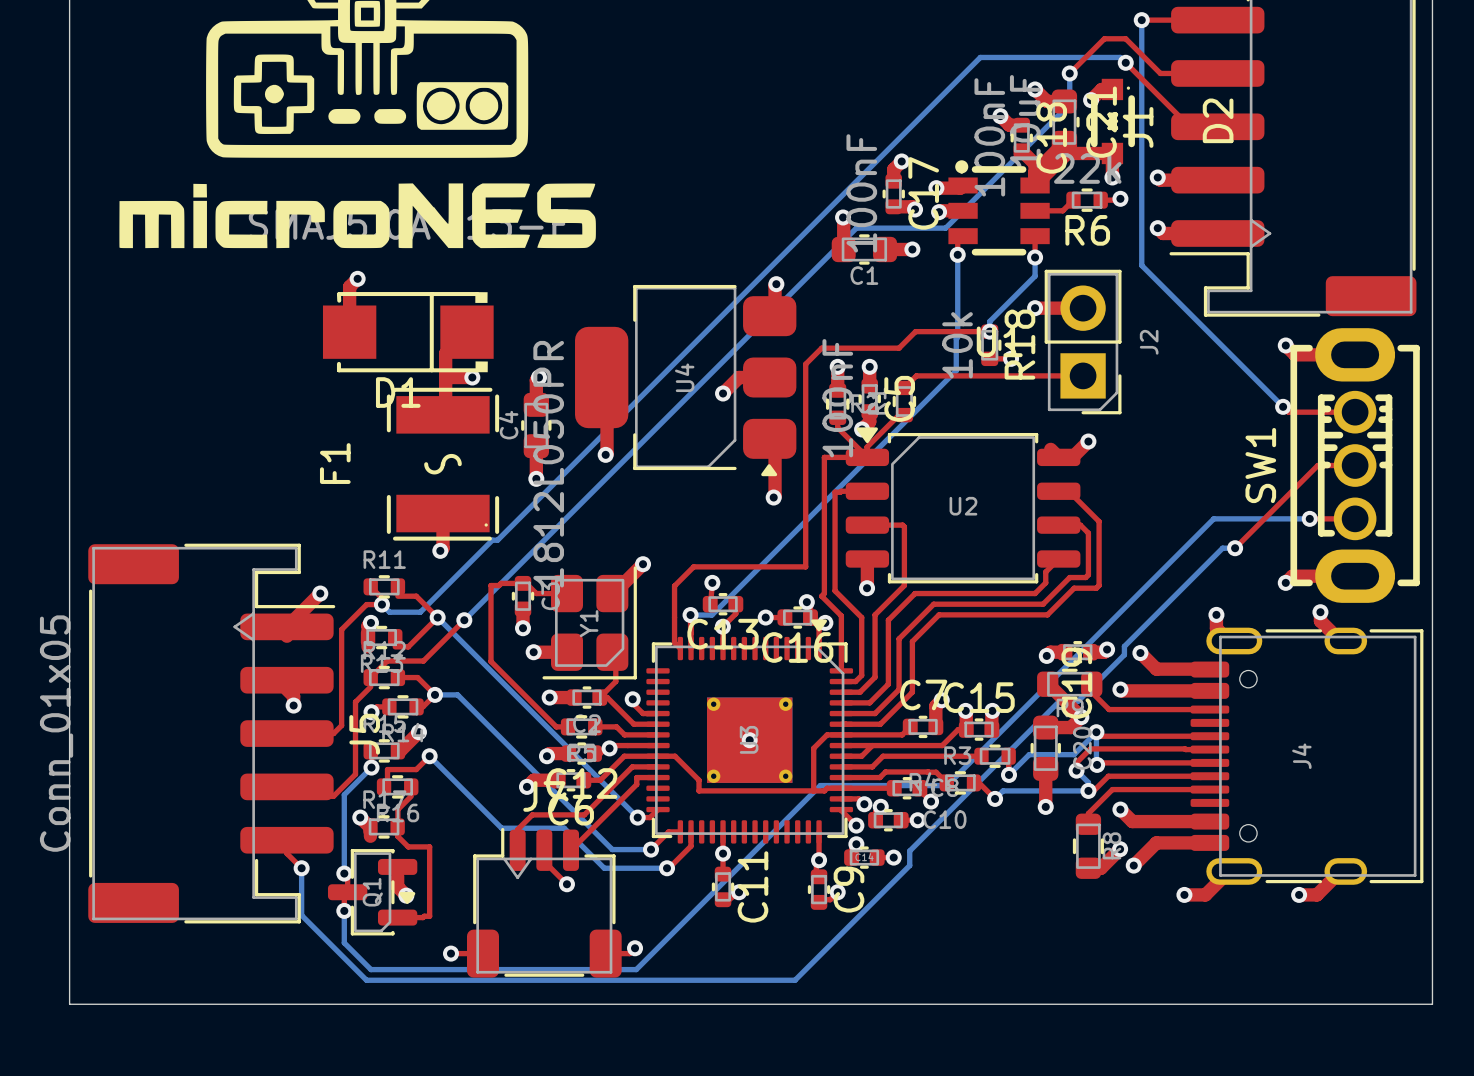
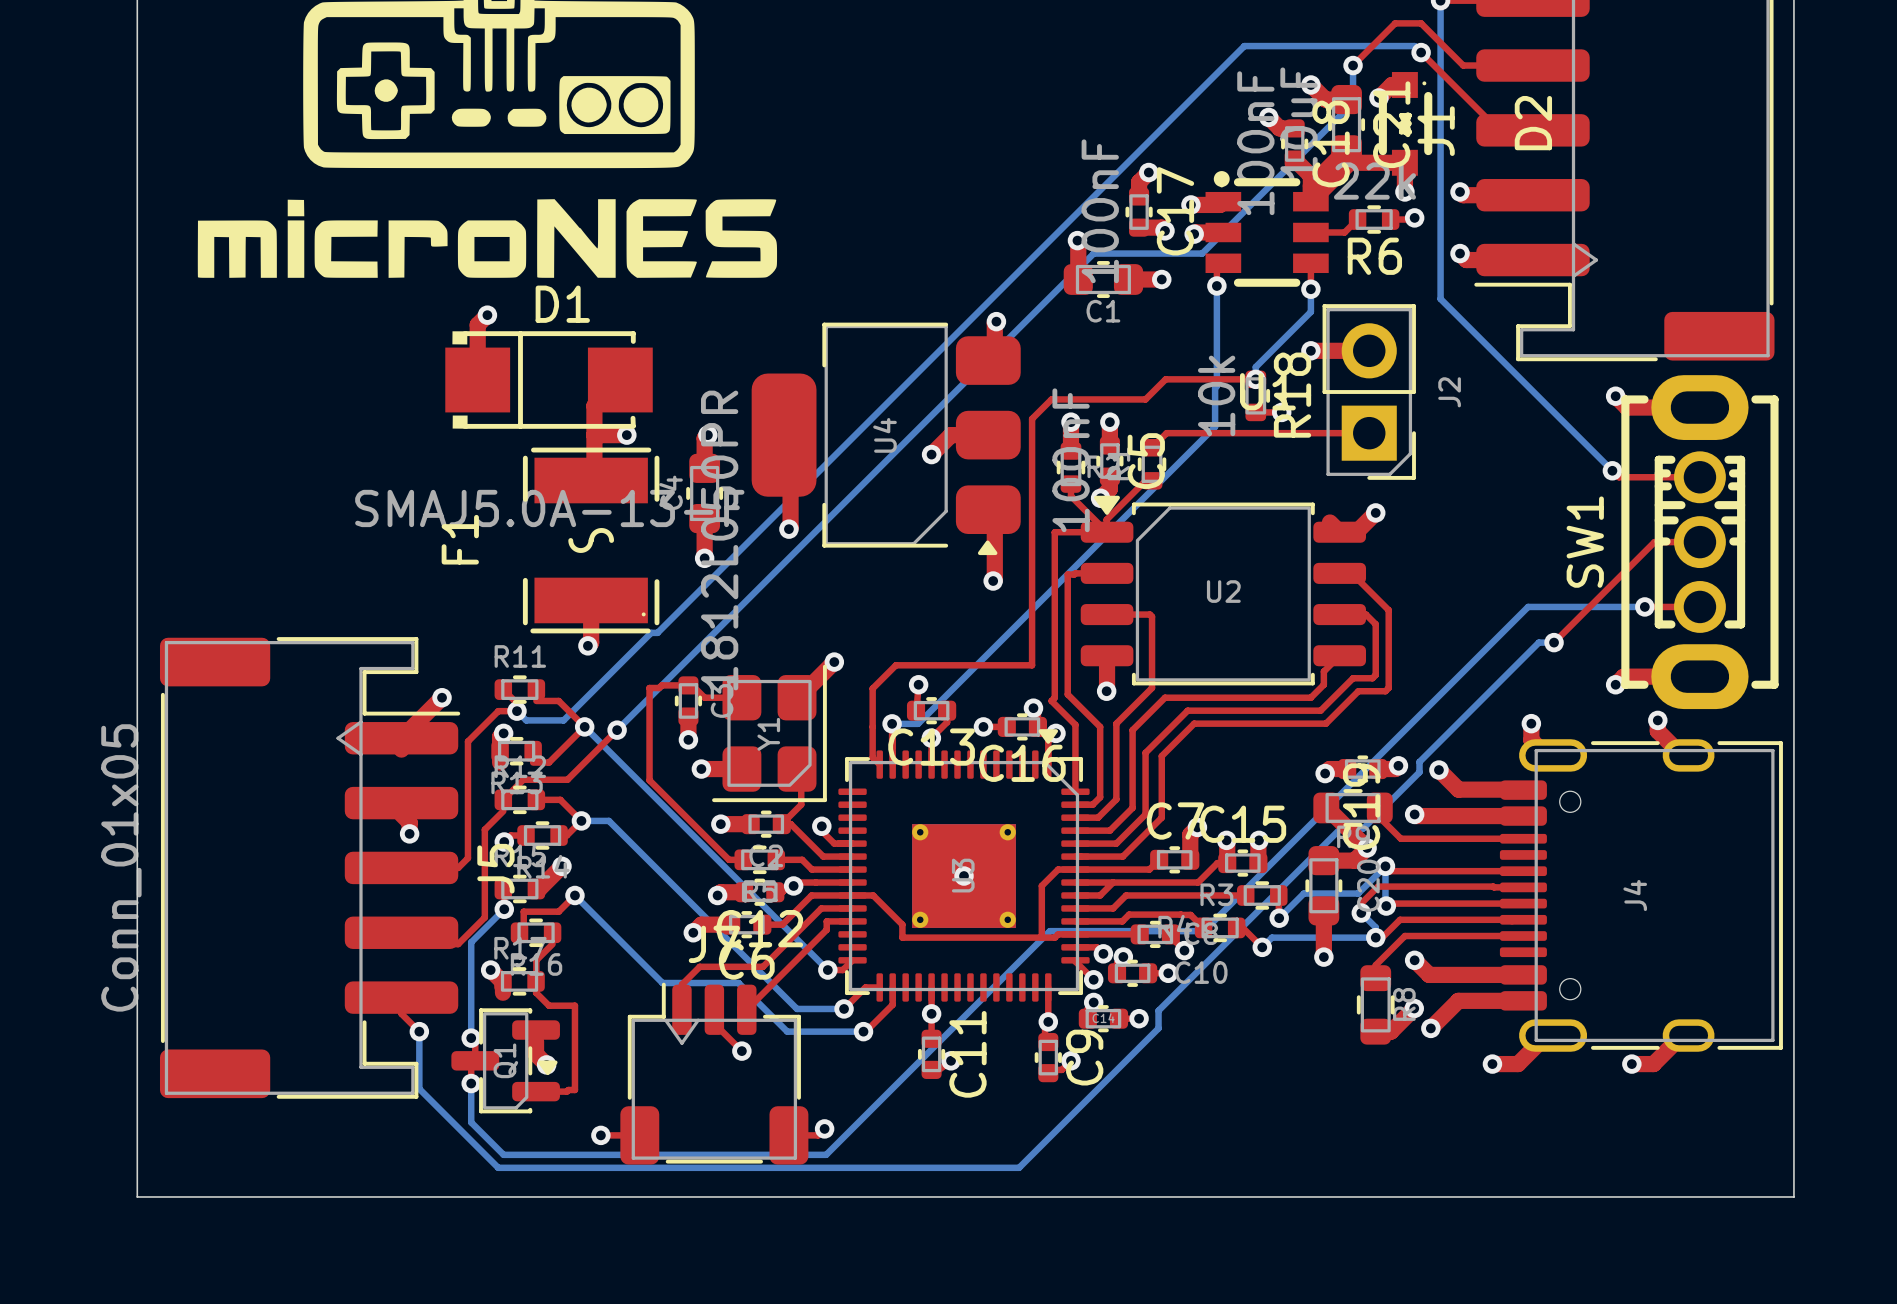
D1 rotation: 0° (408, 332) -> 180° (549, 380)

